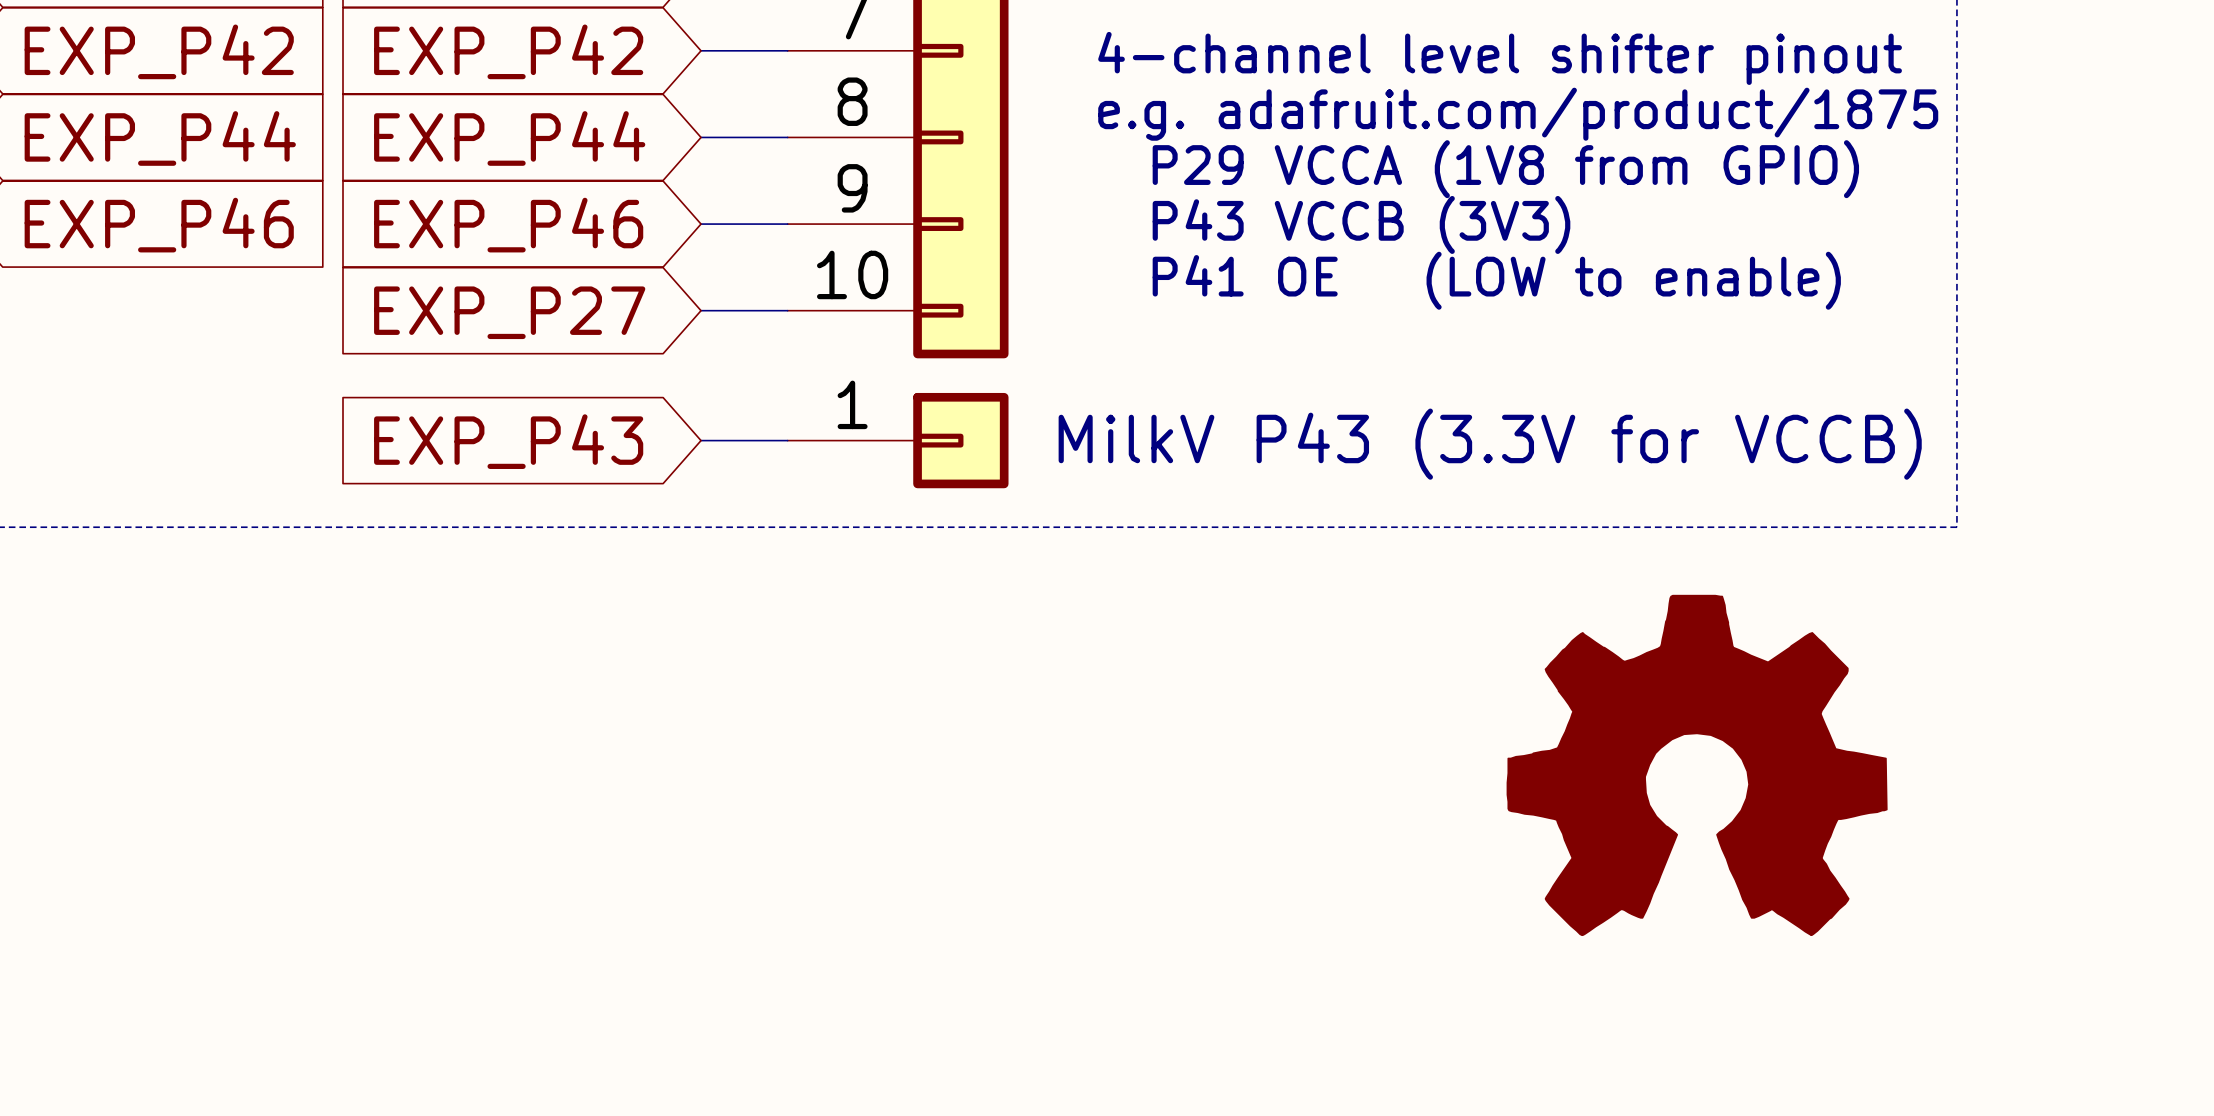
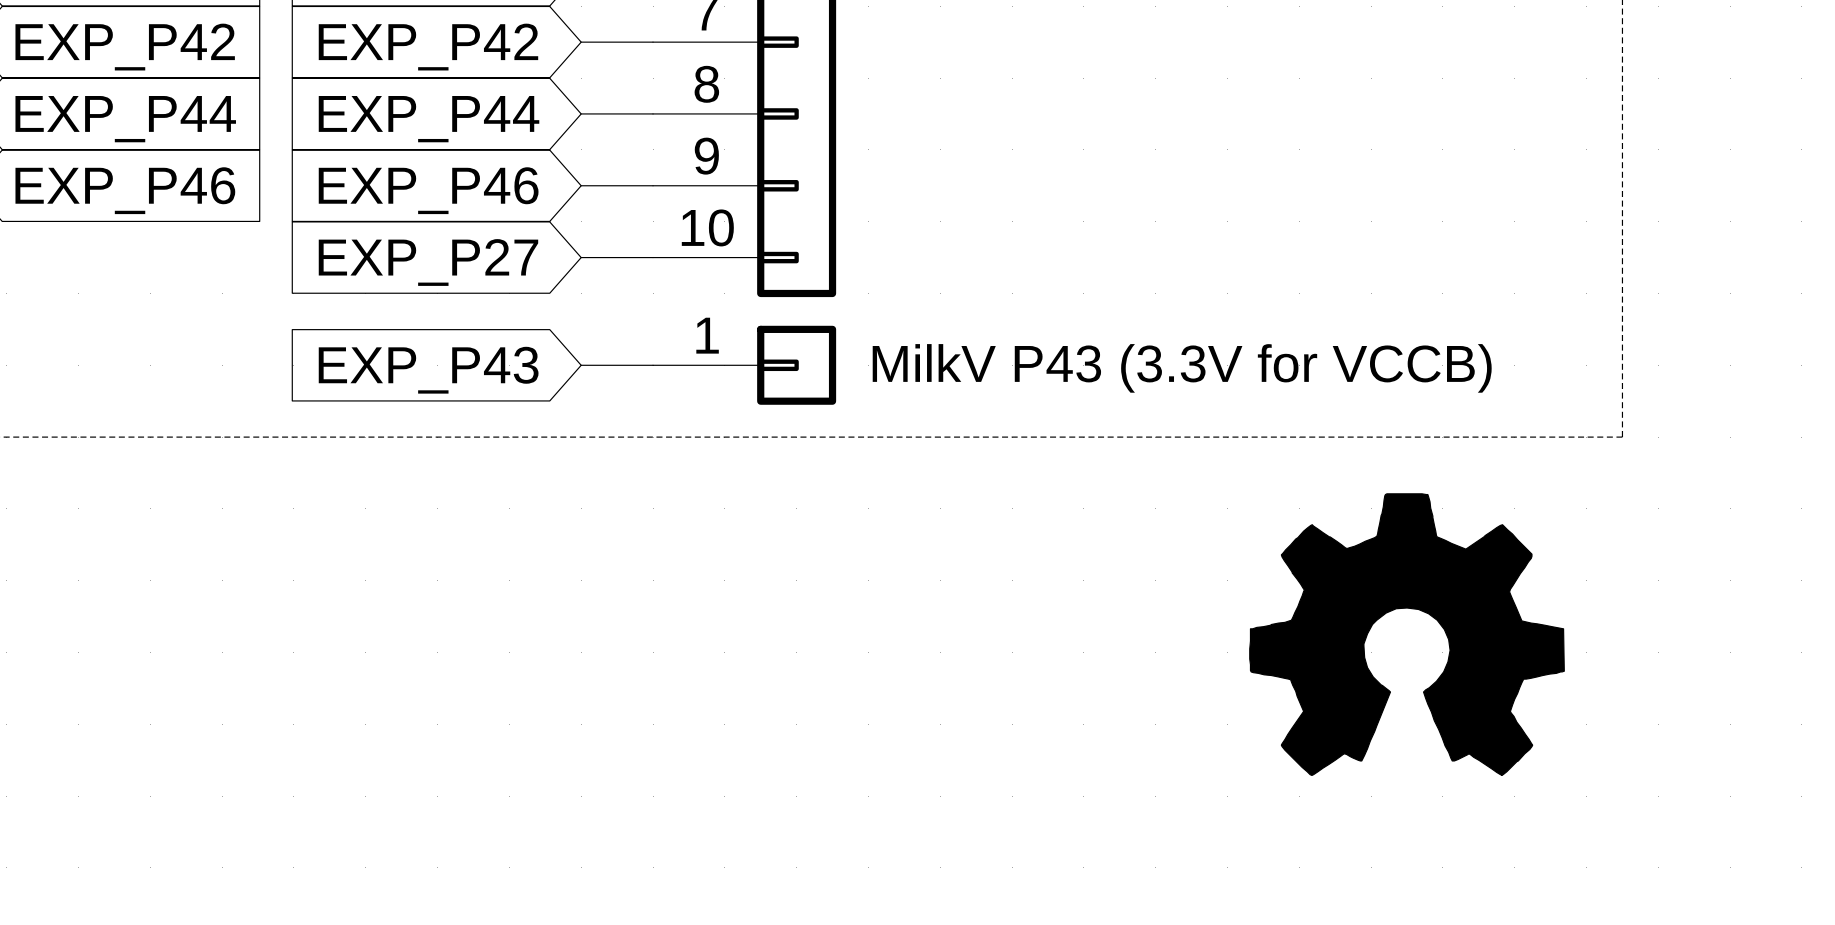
text: 4-channel level shifter pinout (1500, 58) -> none
text: e.g. adafruit.com/product/1875 (1518, 114) -> none
text: P29 VCCA (1V8 from GPIO) (1505, 169) -> none
text: P43 VCCB (3V3) (1361, 224) -> none
text: P41 OE (LOW to enable) (1496, 280) -> none

